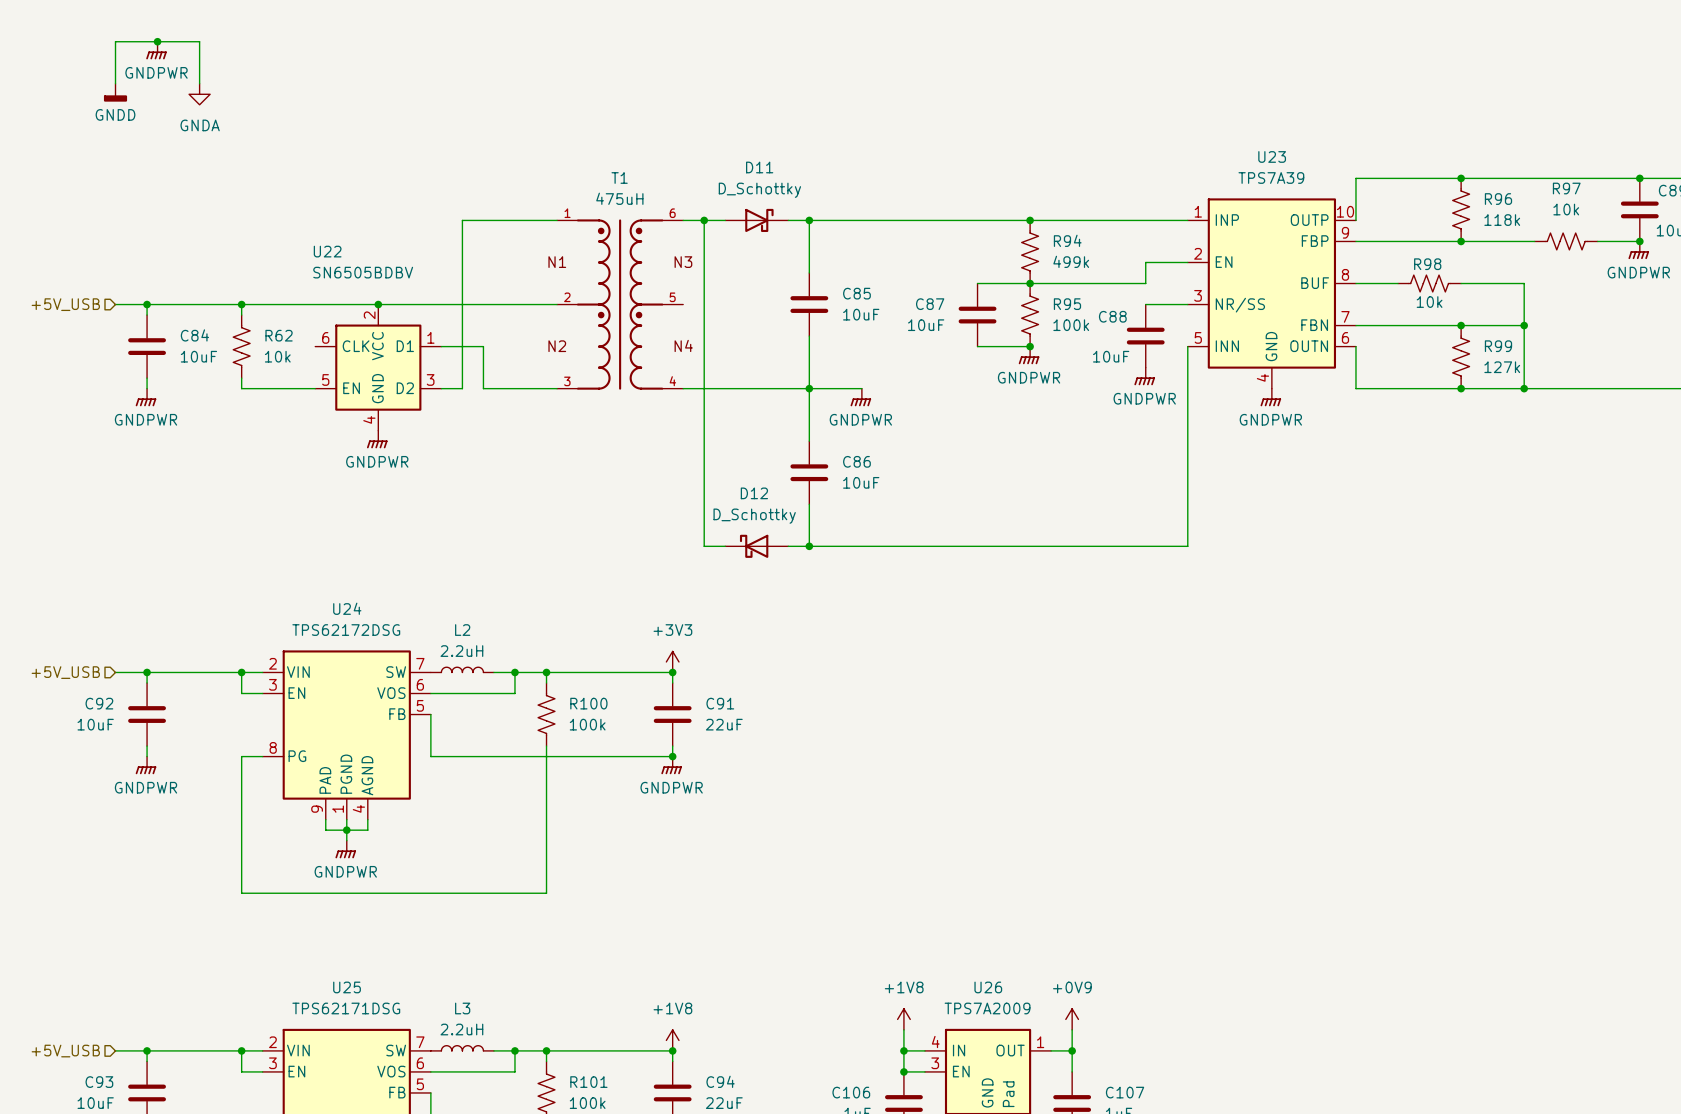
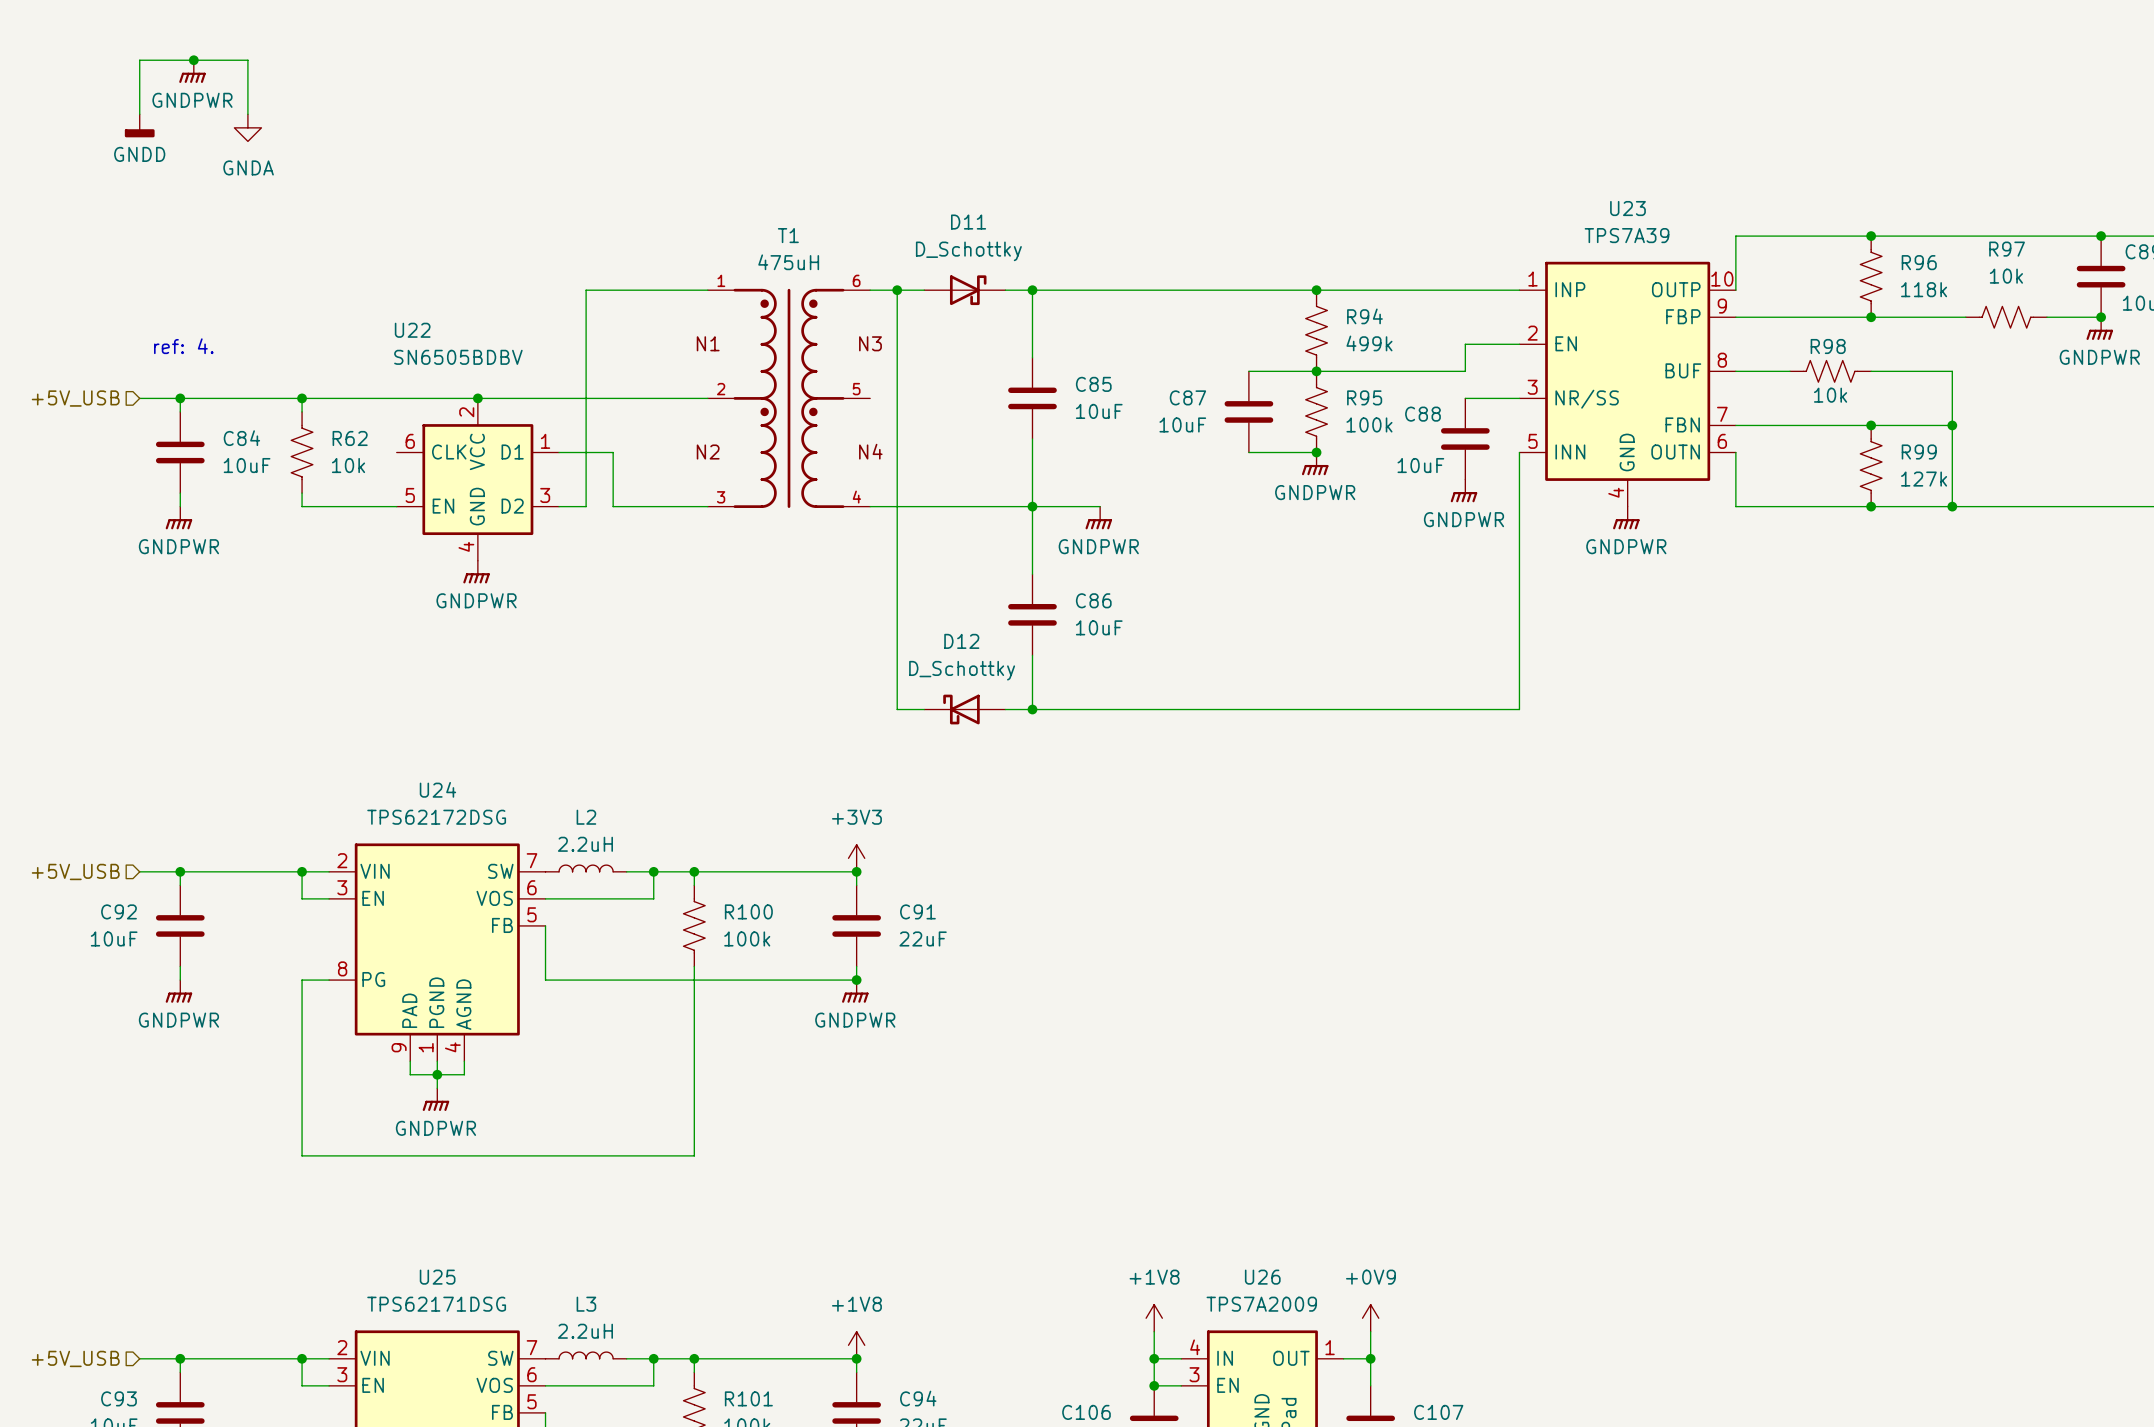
text: none -> ref: 4. (183, 346)

